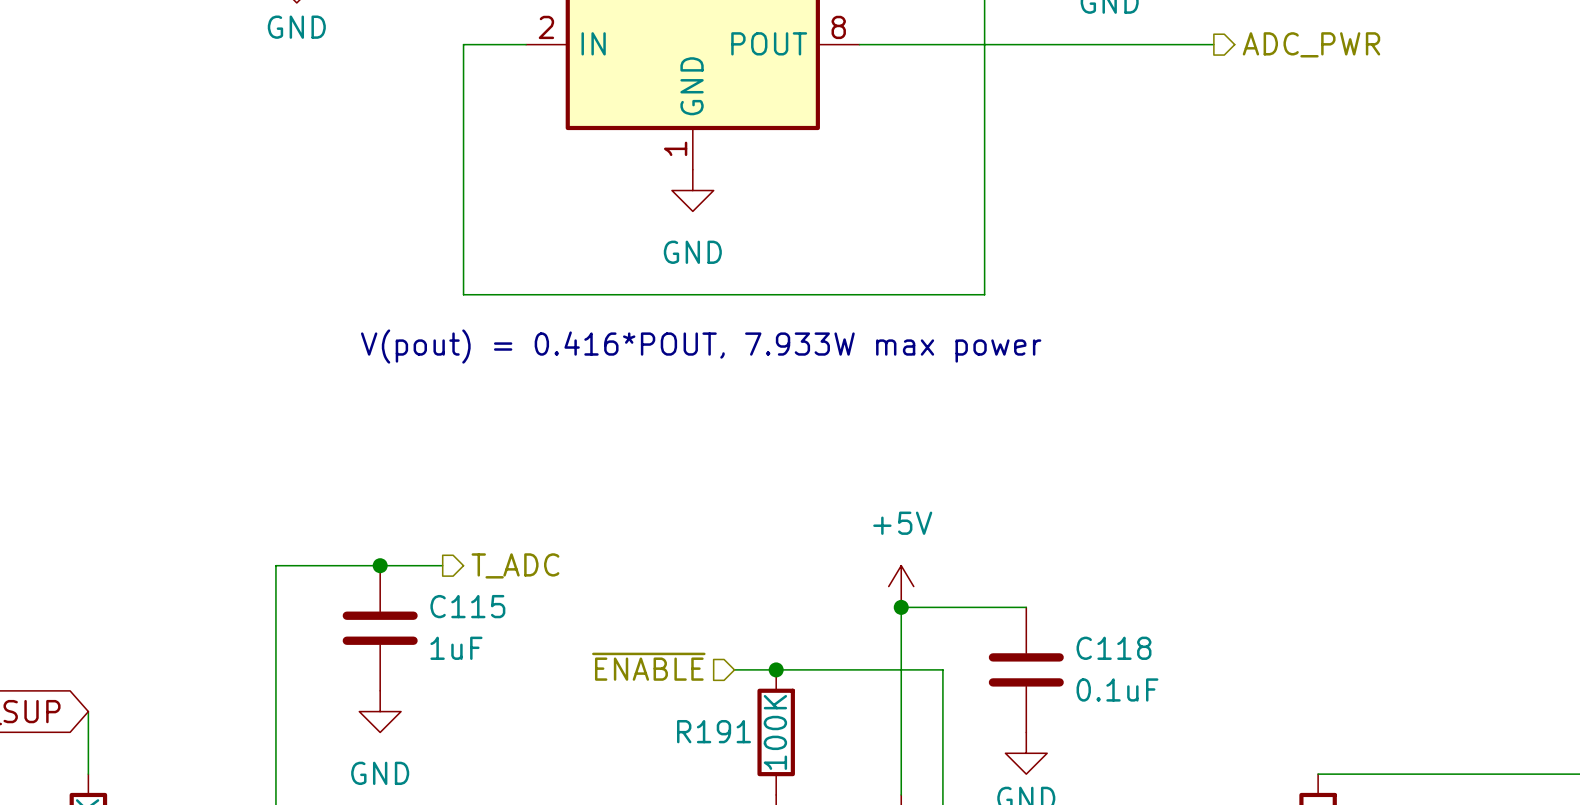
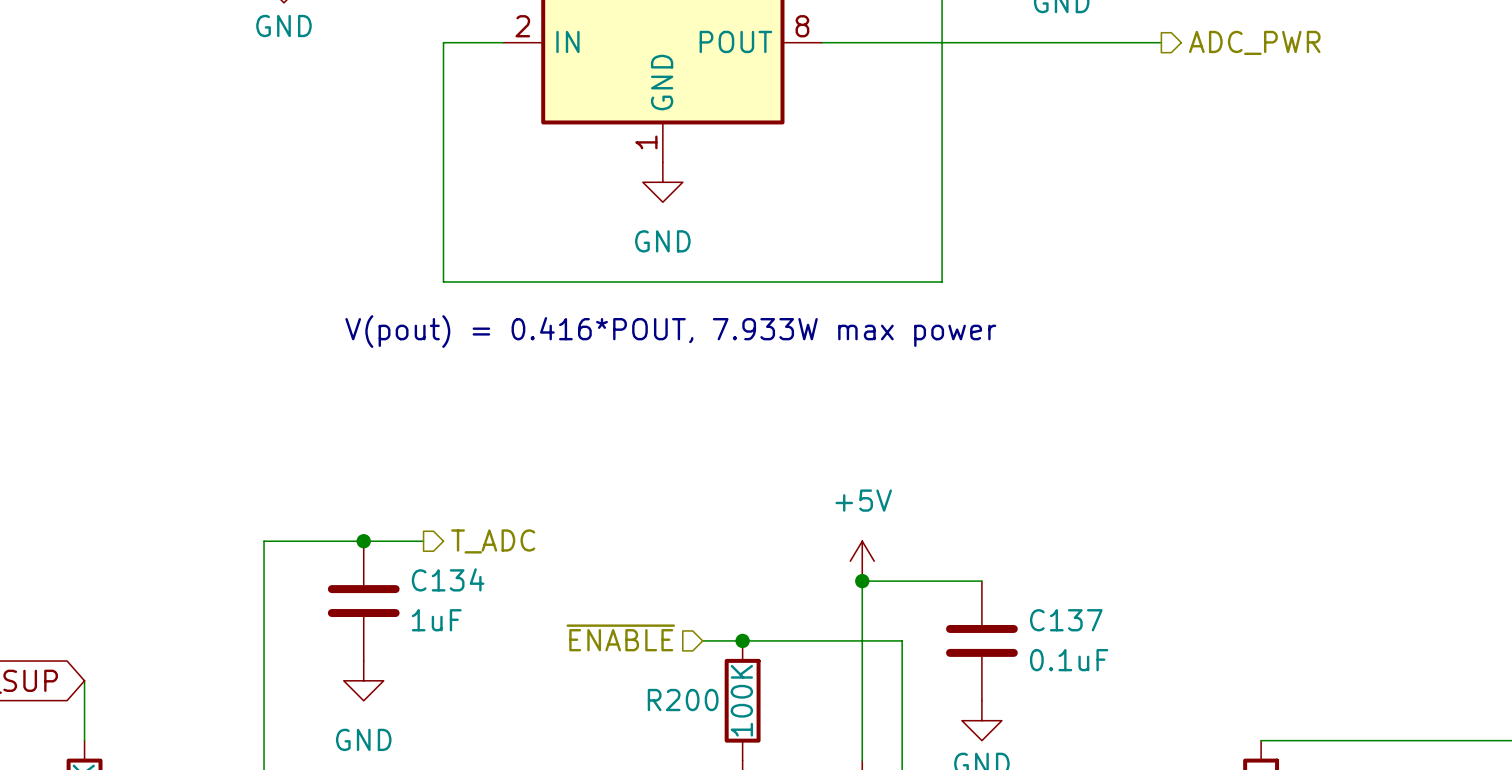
C115 name: C115 (467, 606) -> C134 (448, 579)
C118 name: C118 (1114, 648) -> C137 (1066, 620)
R191 name: R191 (714, 731) -> R200 (683, 700)

